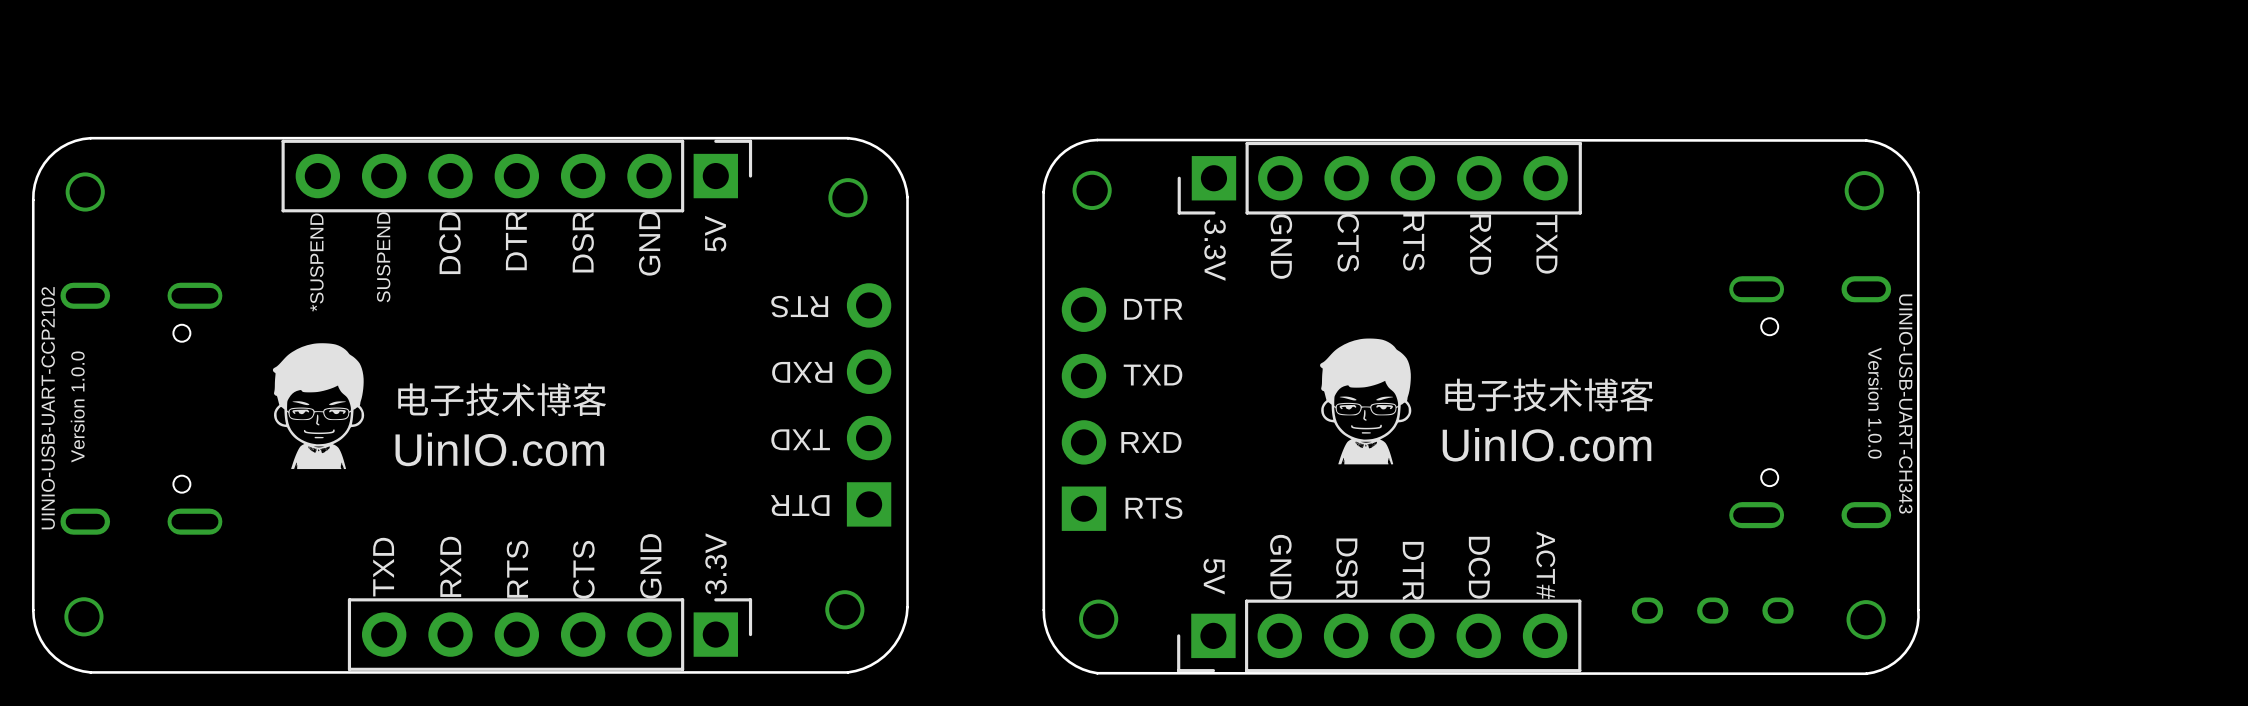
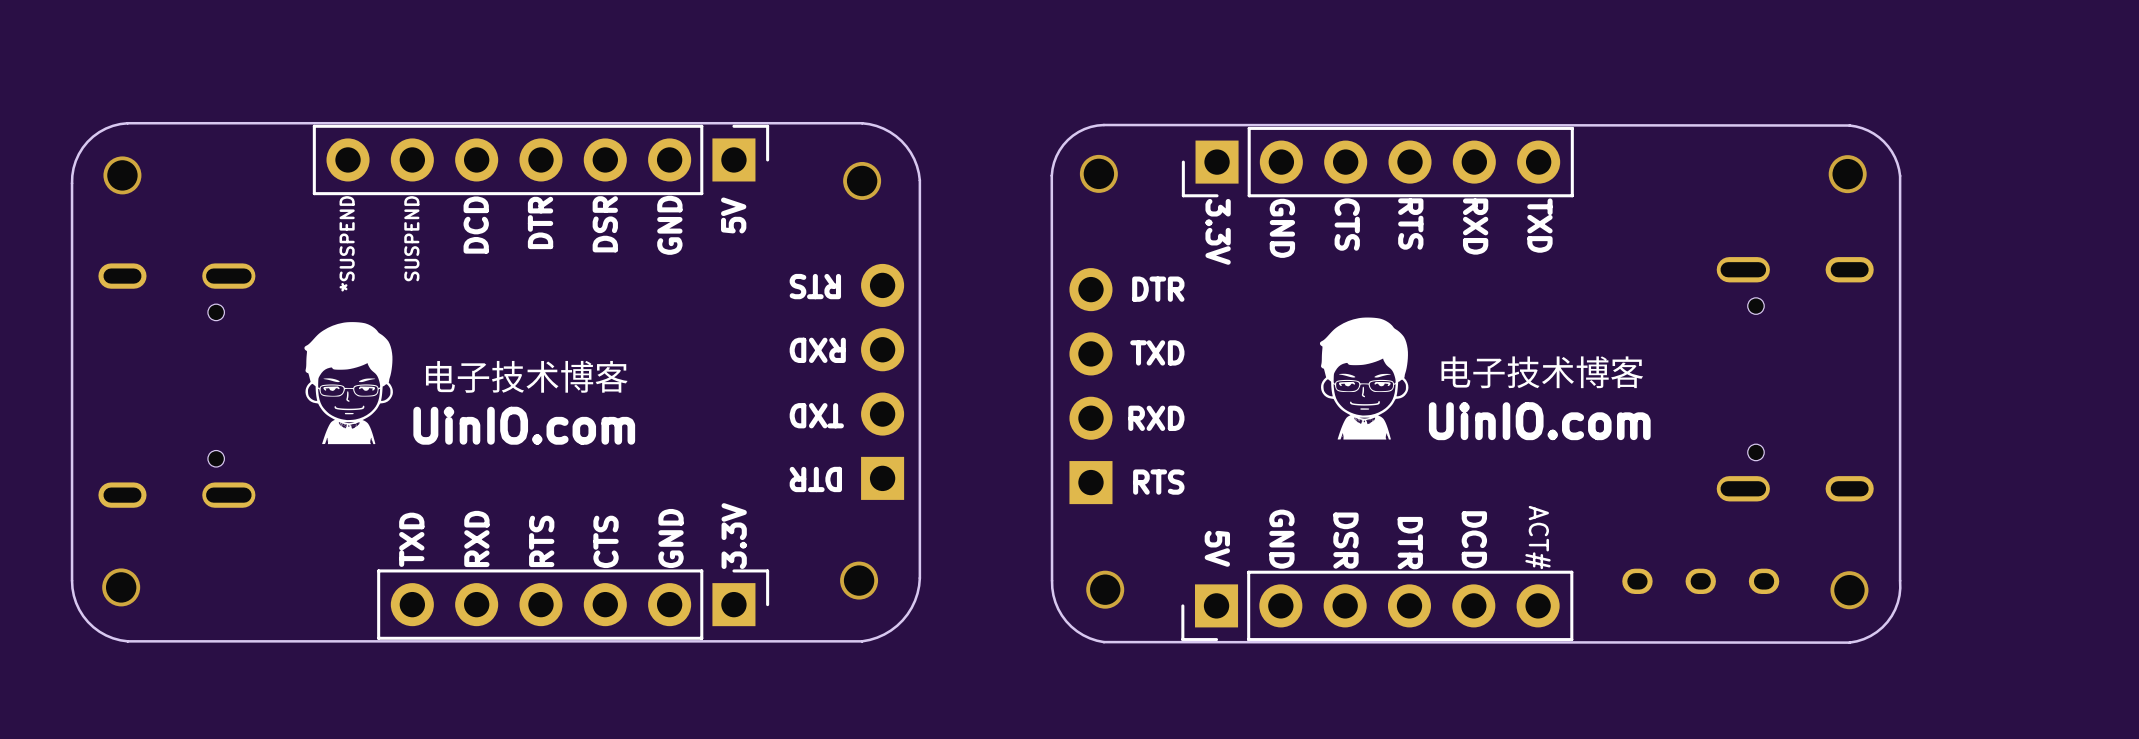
text: Version 1.0.0 (1875, 403) -> none
text: UINIO-USB-UART-CH343 (1905, 404) -> none
text: Version 1.0.0 (77, 406) -> none
text: UINIO-USB-UART-CCP2102 (48, 408) -> none

